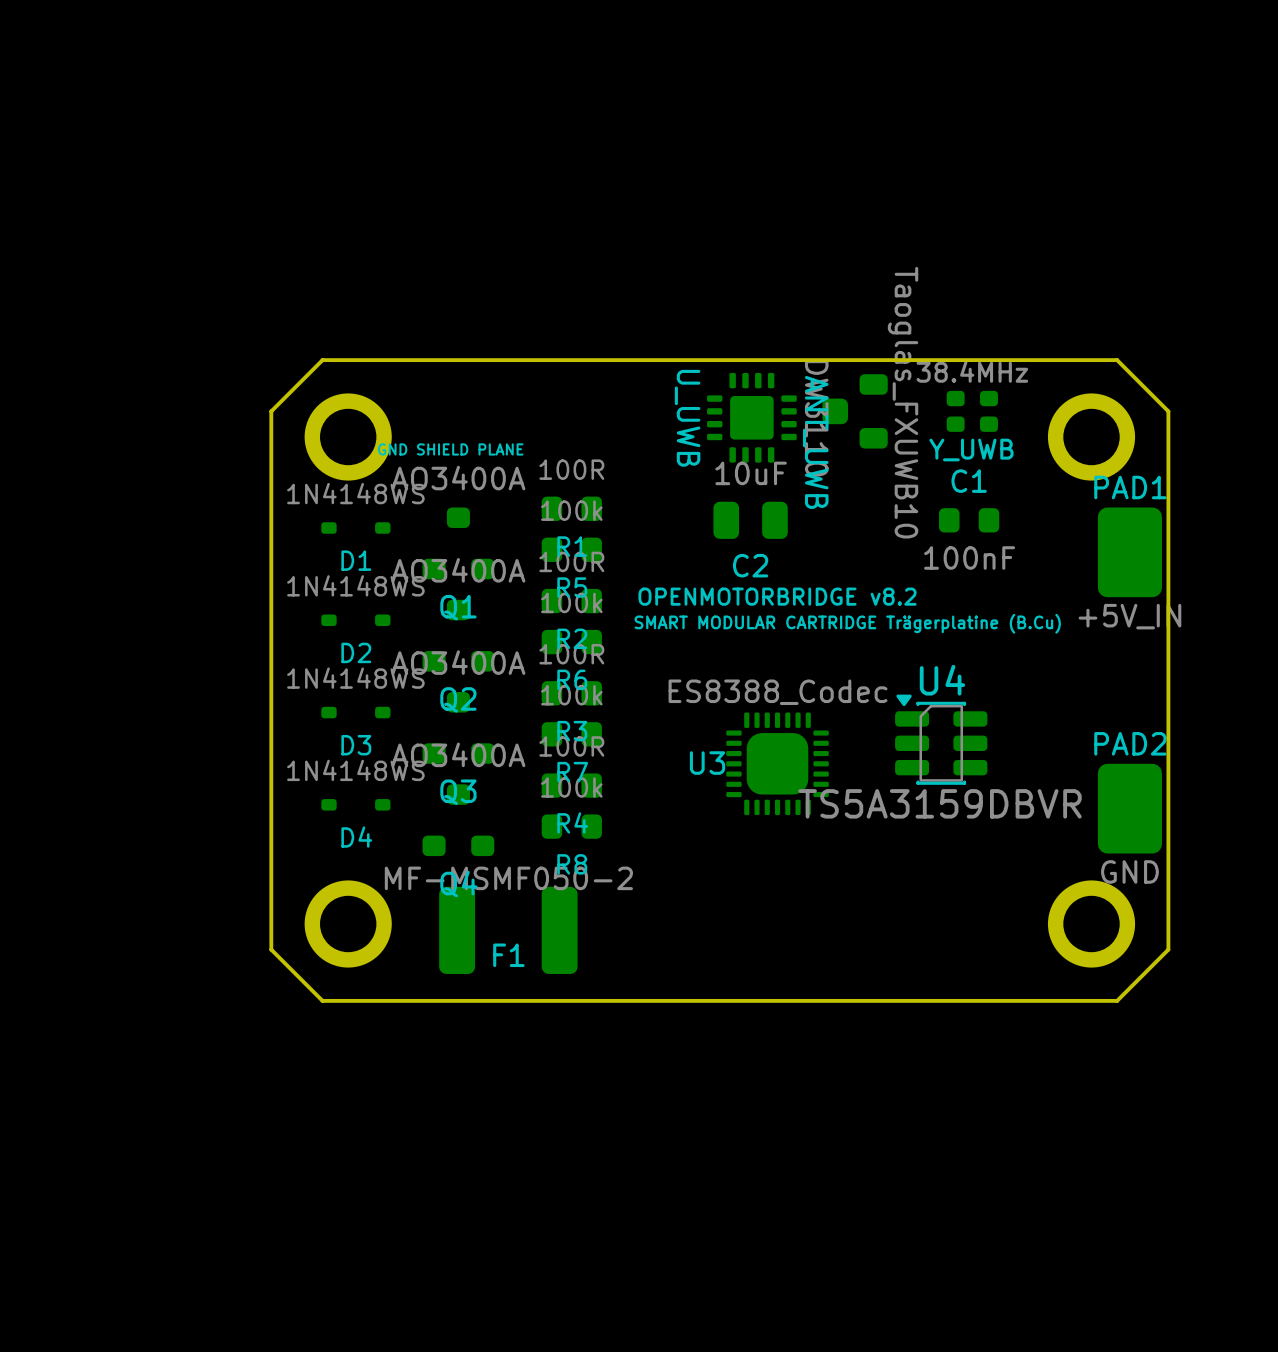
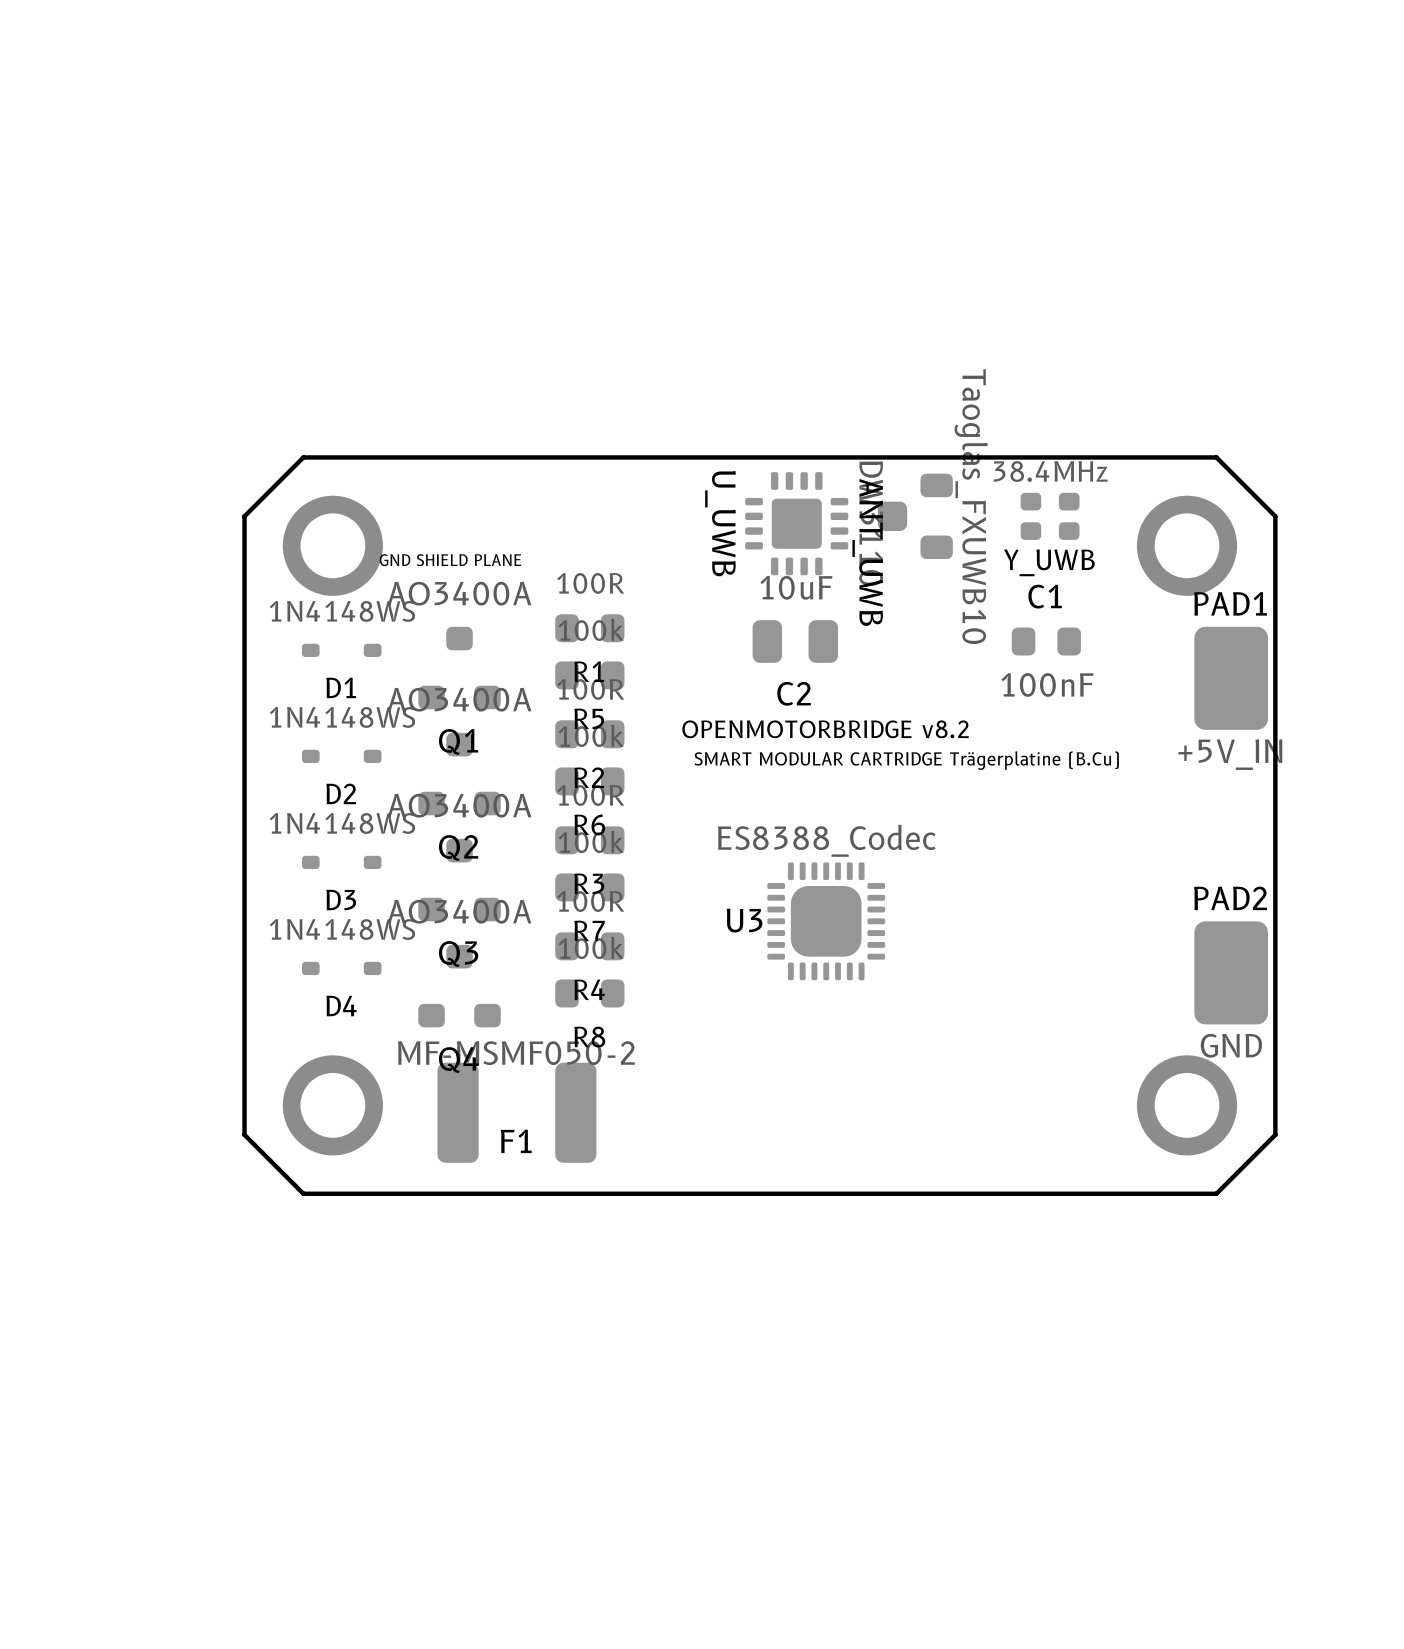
U4: TS5A3159DBVR (941, 739) -> none

